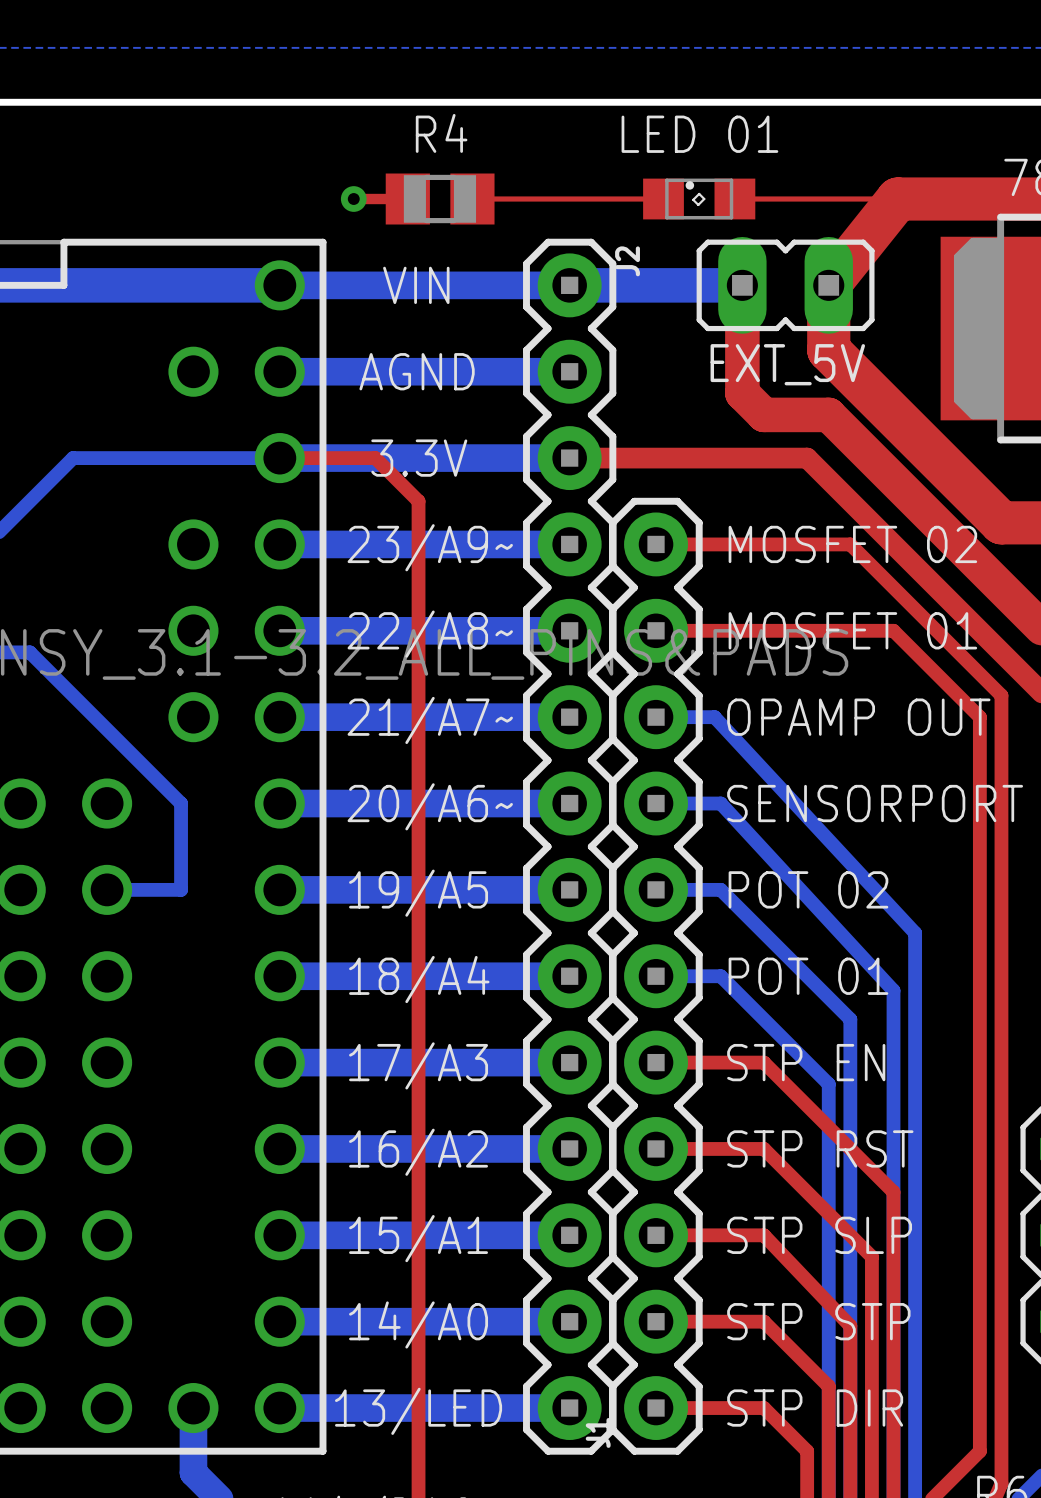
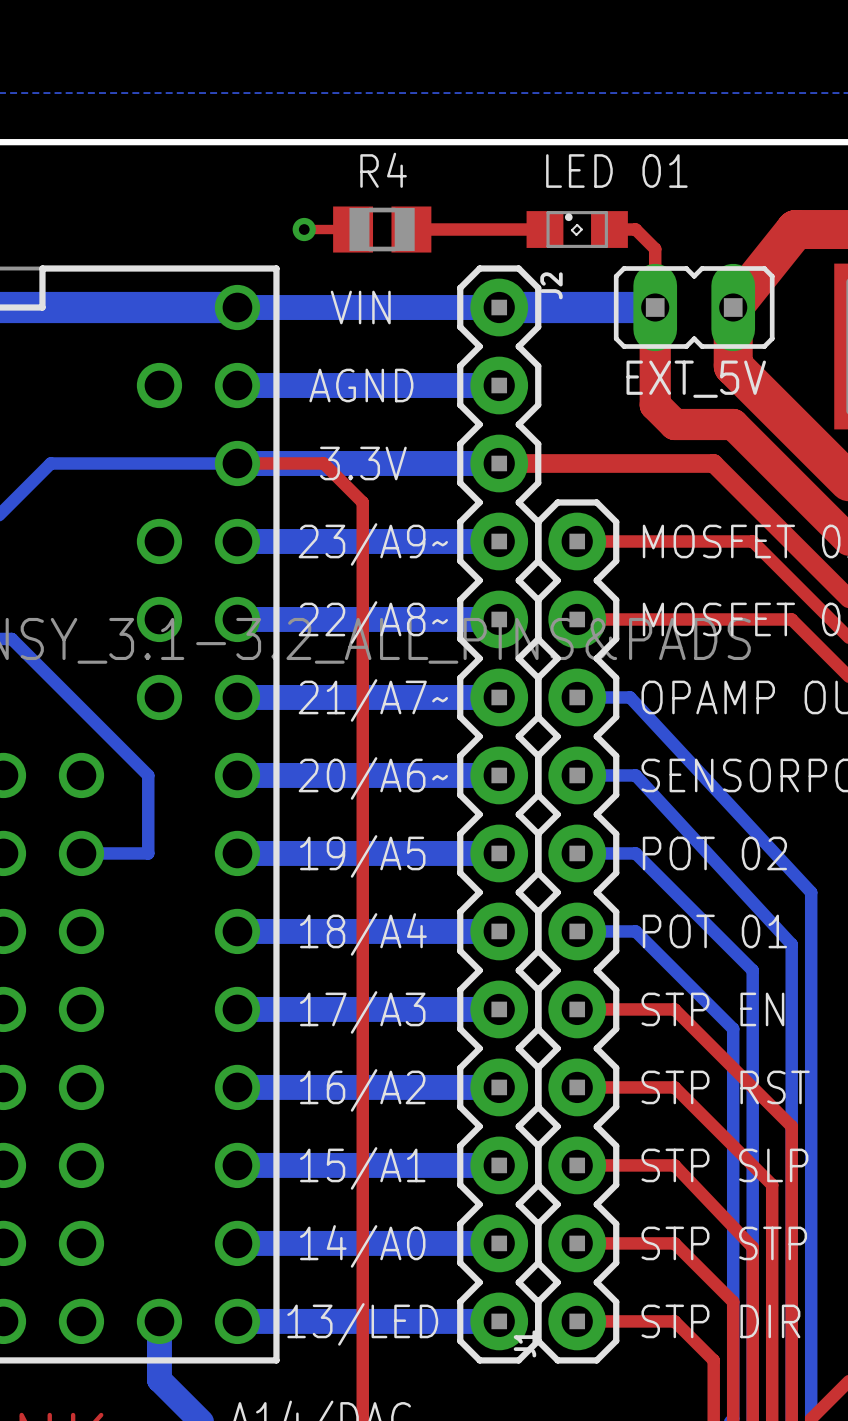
top track width: thin (472, 199) (620, 199) -> thick (411, 229) (544, 229)
top track: (620, 199) (663, 199) -> none
top track: none -> (609, 229) (635, 229) (655, 249) (655, 307)
part position: (699, 199) -> (577, 229)
top track: (734, 199) (897, 199) -> none

